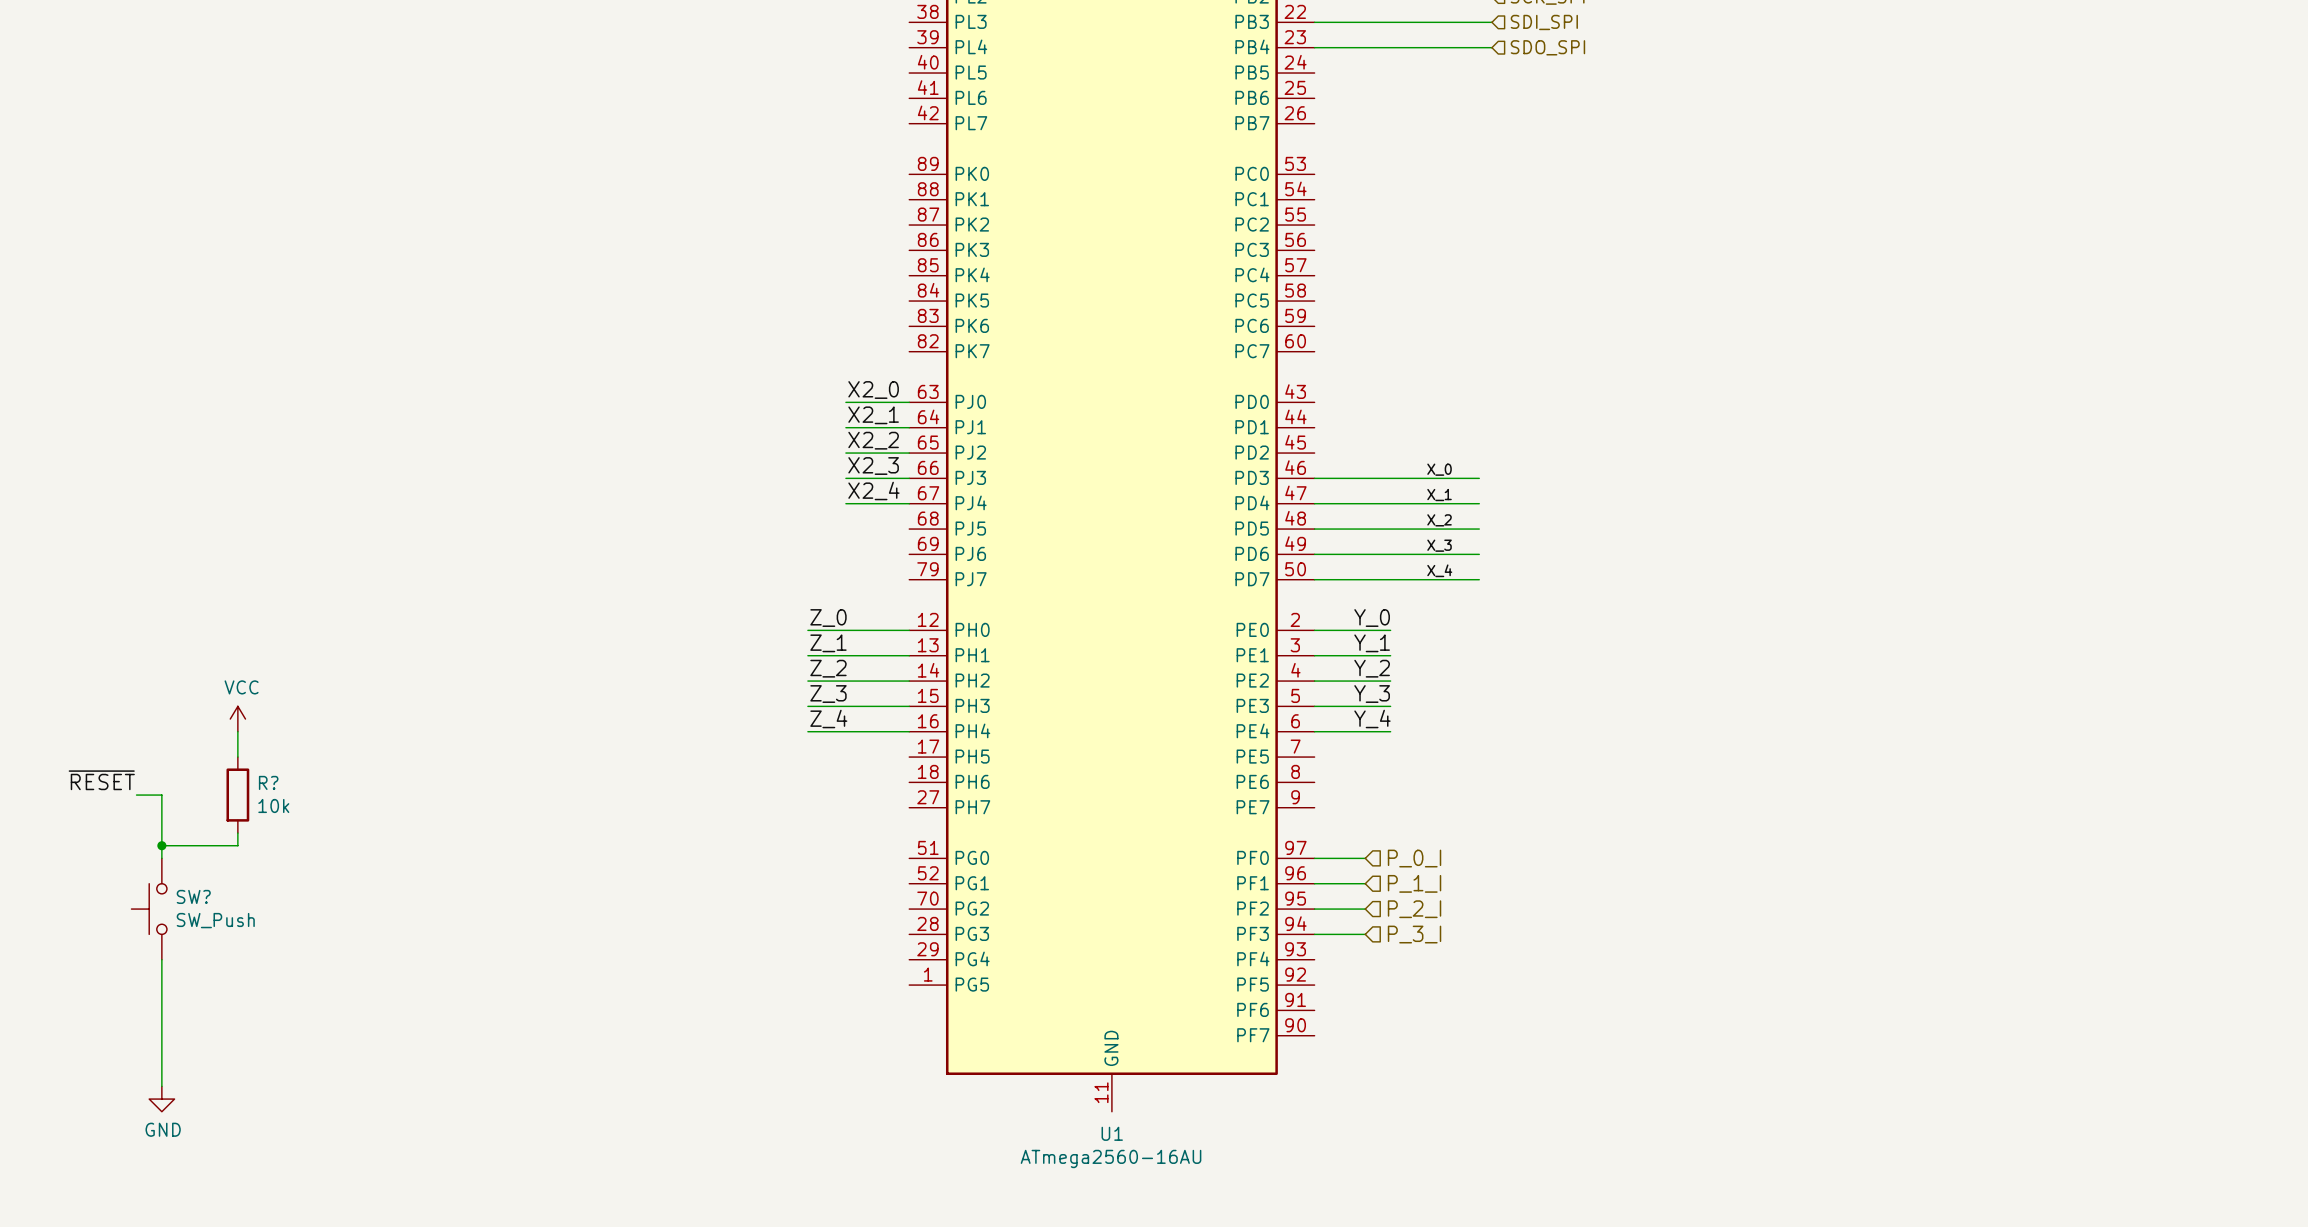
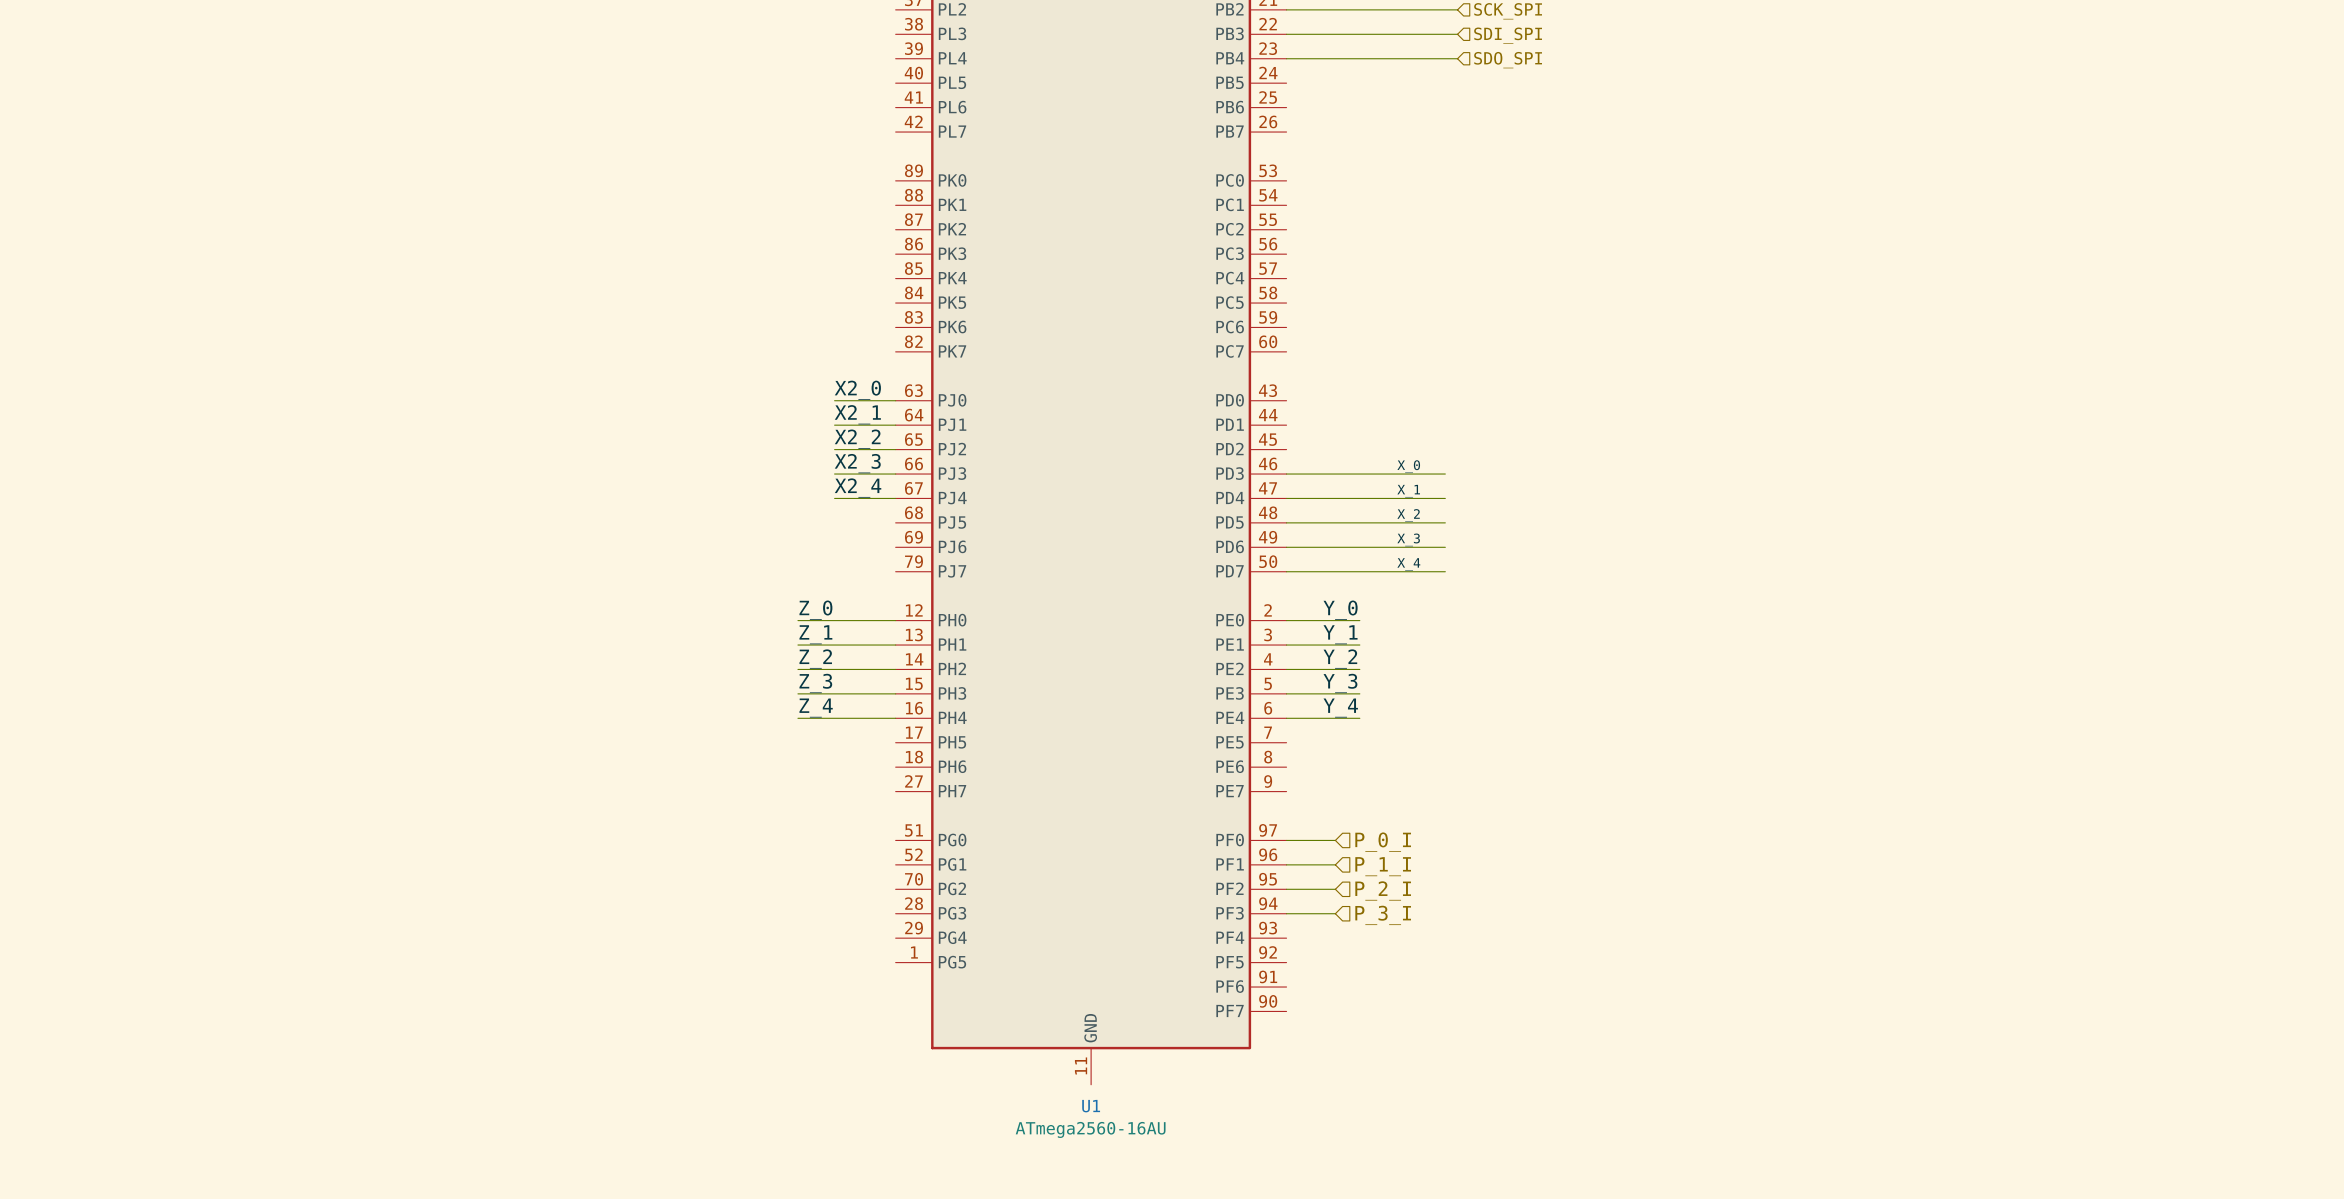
power symbol: VCC (237, 719) -> none
wire: (237, 731) (237, 757) -> none
label: ~{RESET} (101, 780) -> none
wire: (136, 795) (161, 795) (161, 858) -> none
R?: 10k (237, 795) -> none
wire: (237, 833) (237, 845) (161, 845) -> none
junction: (161, 845) -> none
SW?: SW_Push (149, 909) -> none
wire: (161, 959) (161, 1086) -> none
power symbol: GND (161, 1099) -> none

